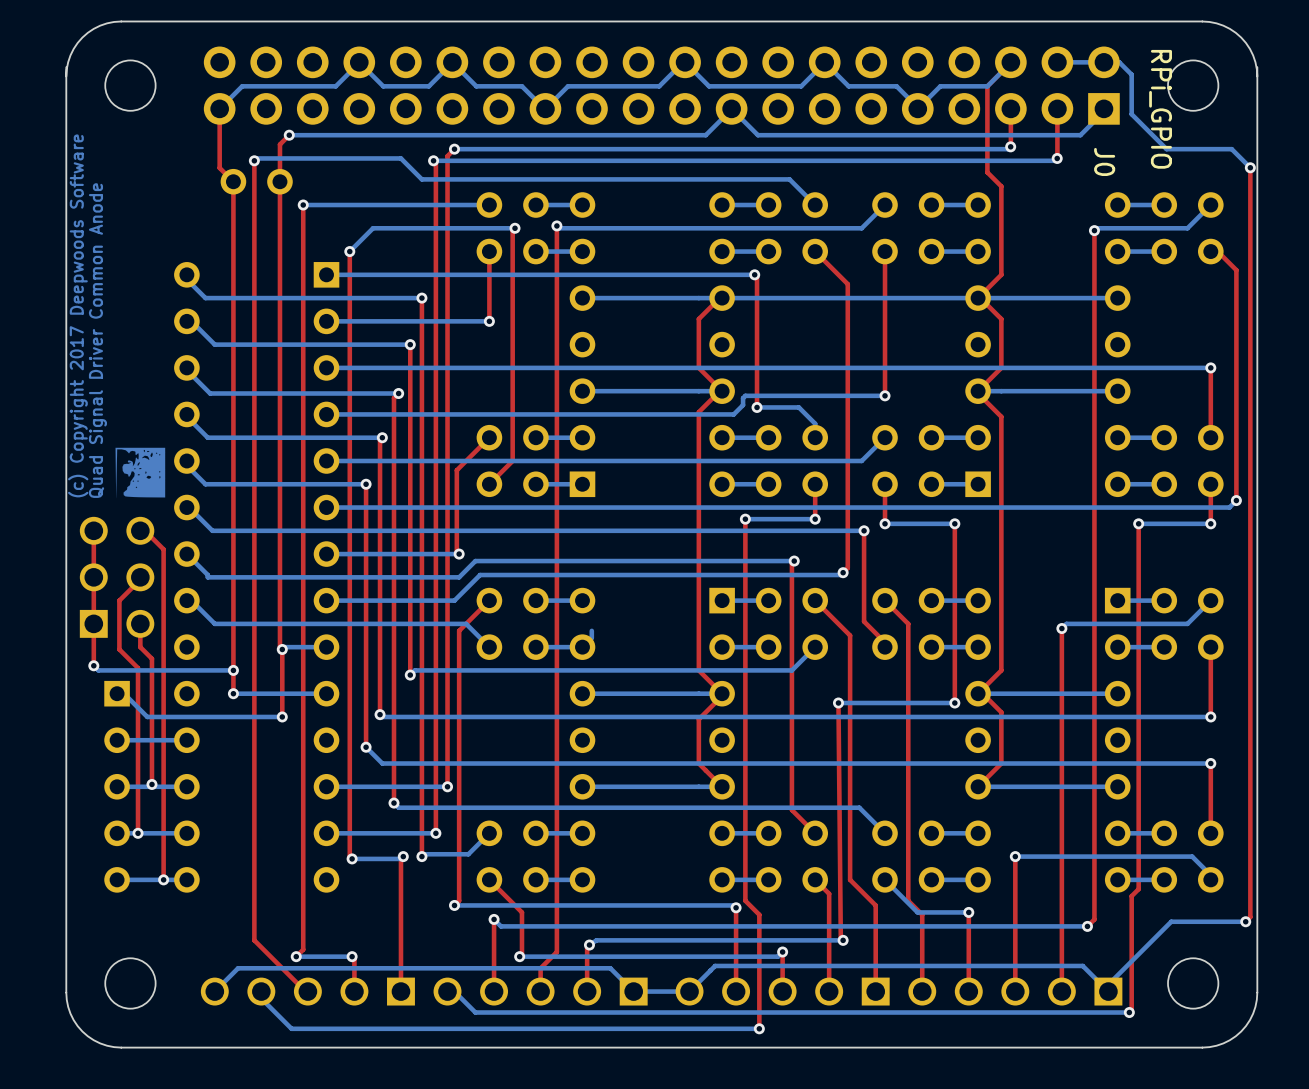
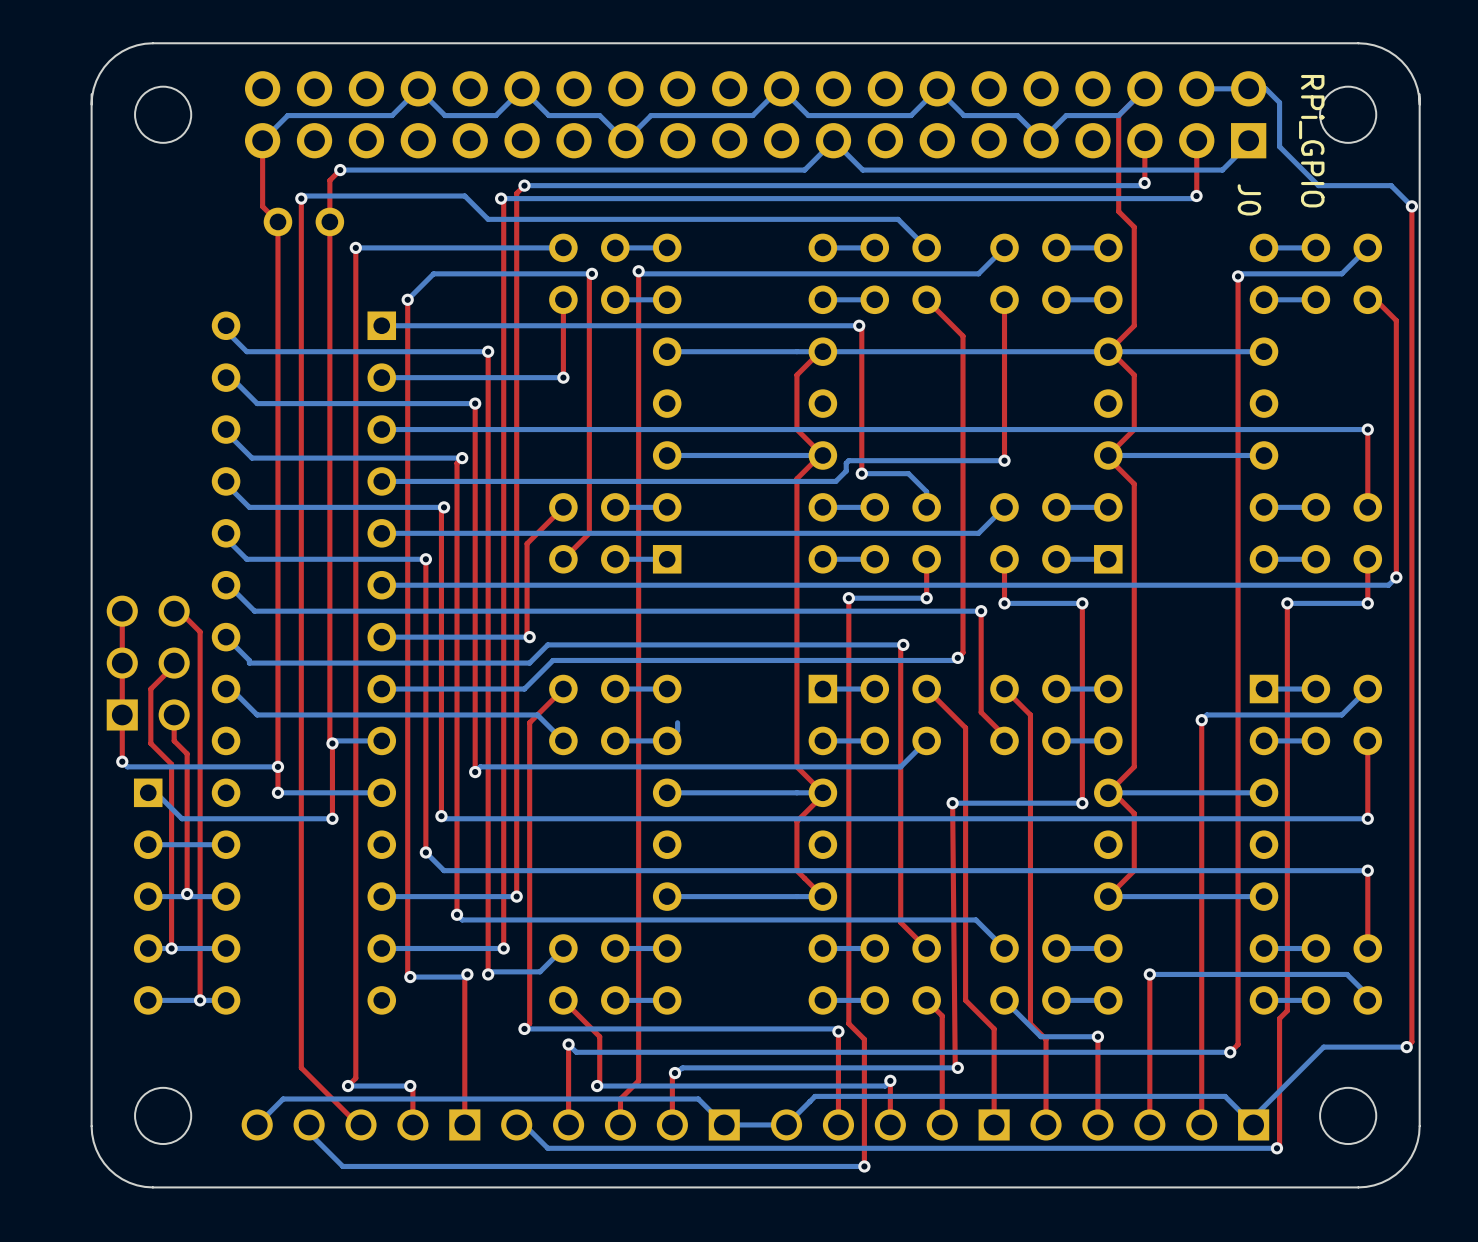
text: (c) Copyright 2017 Deepwoods Software (78, 315) -> none
text: Quad Signal Driver Common Anode (97, 340) -> none
drawing: [115, 447, 166, 499] -> none

